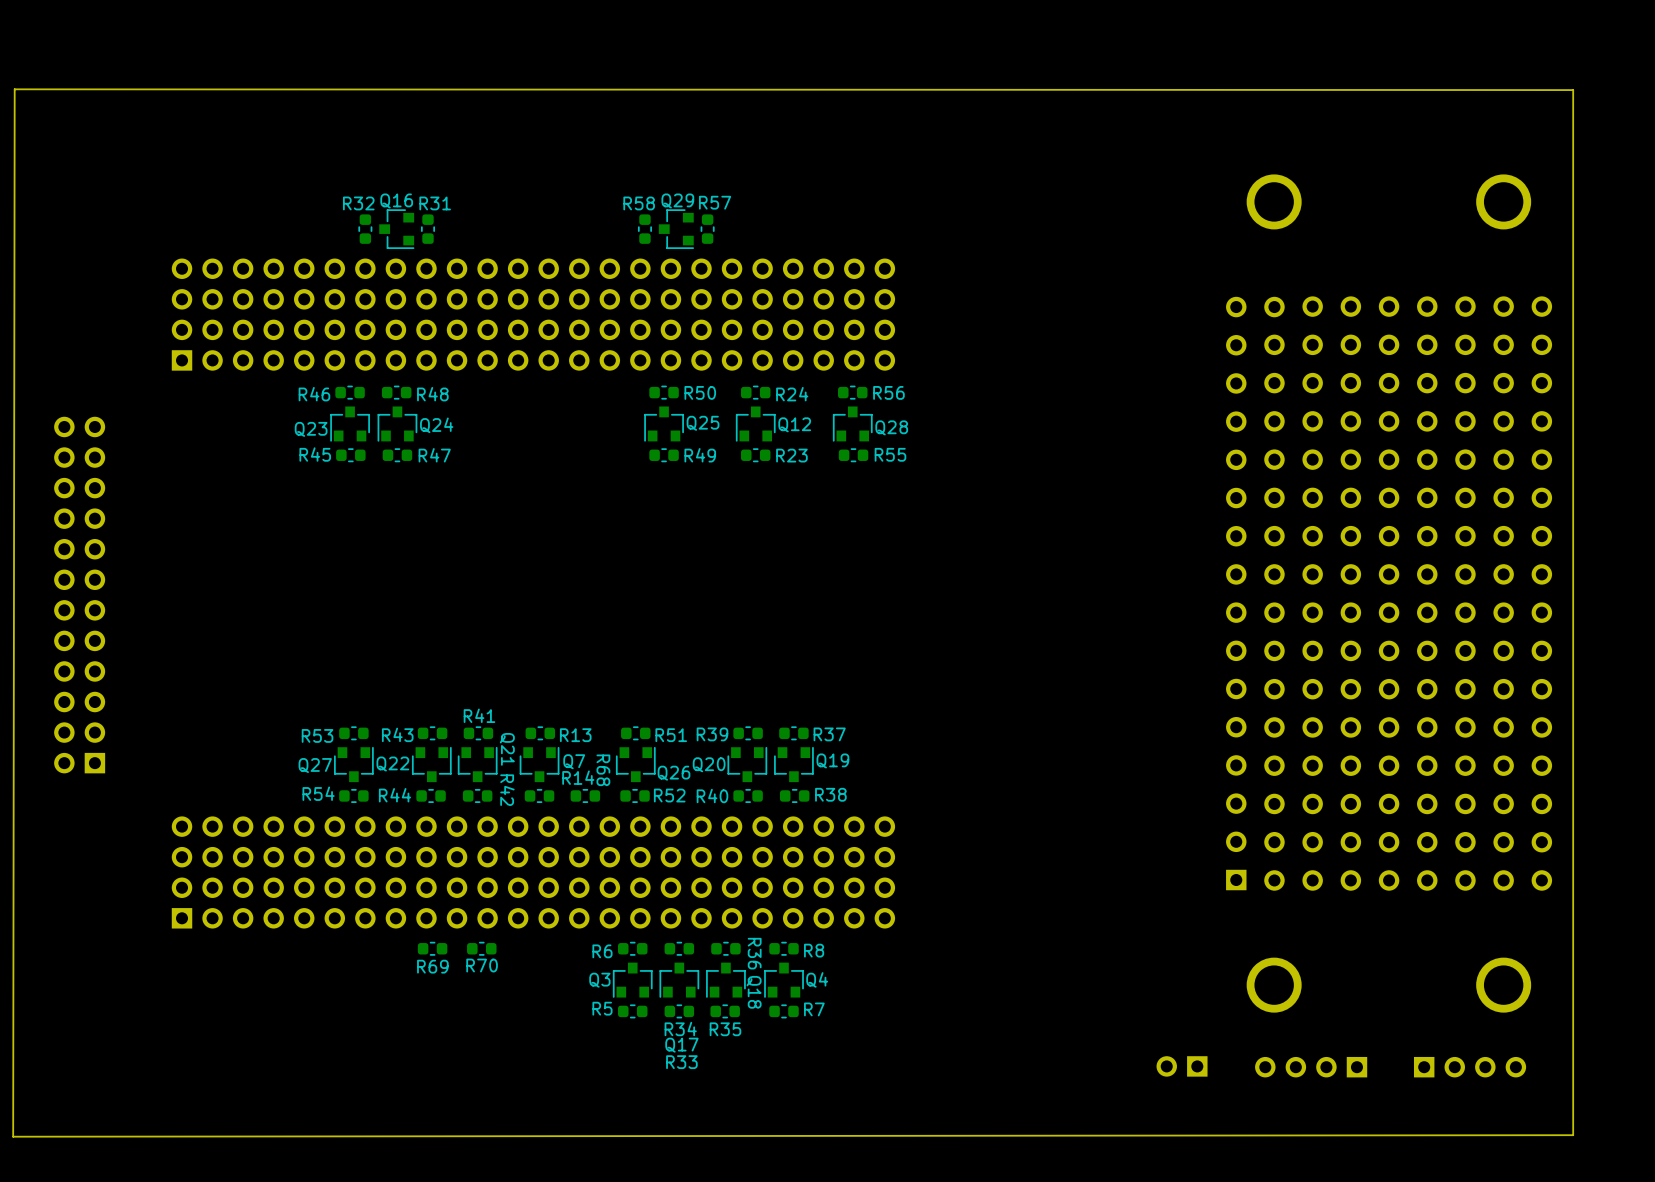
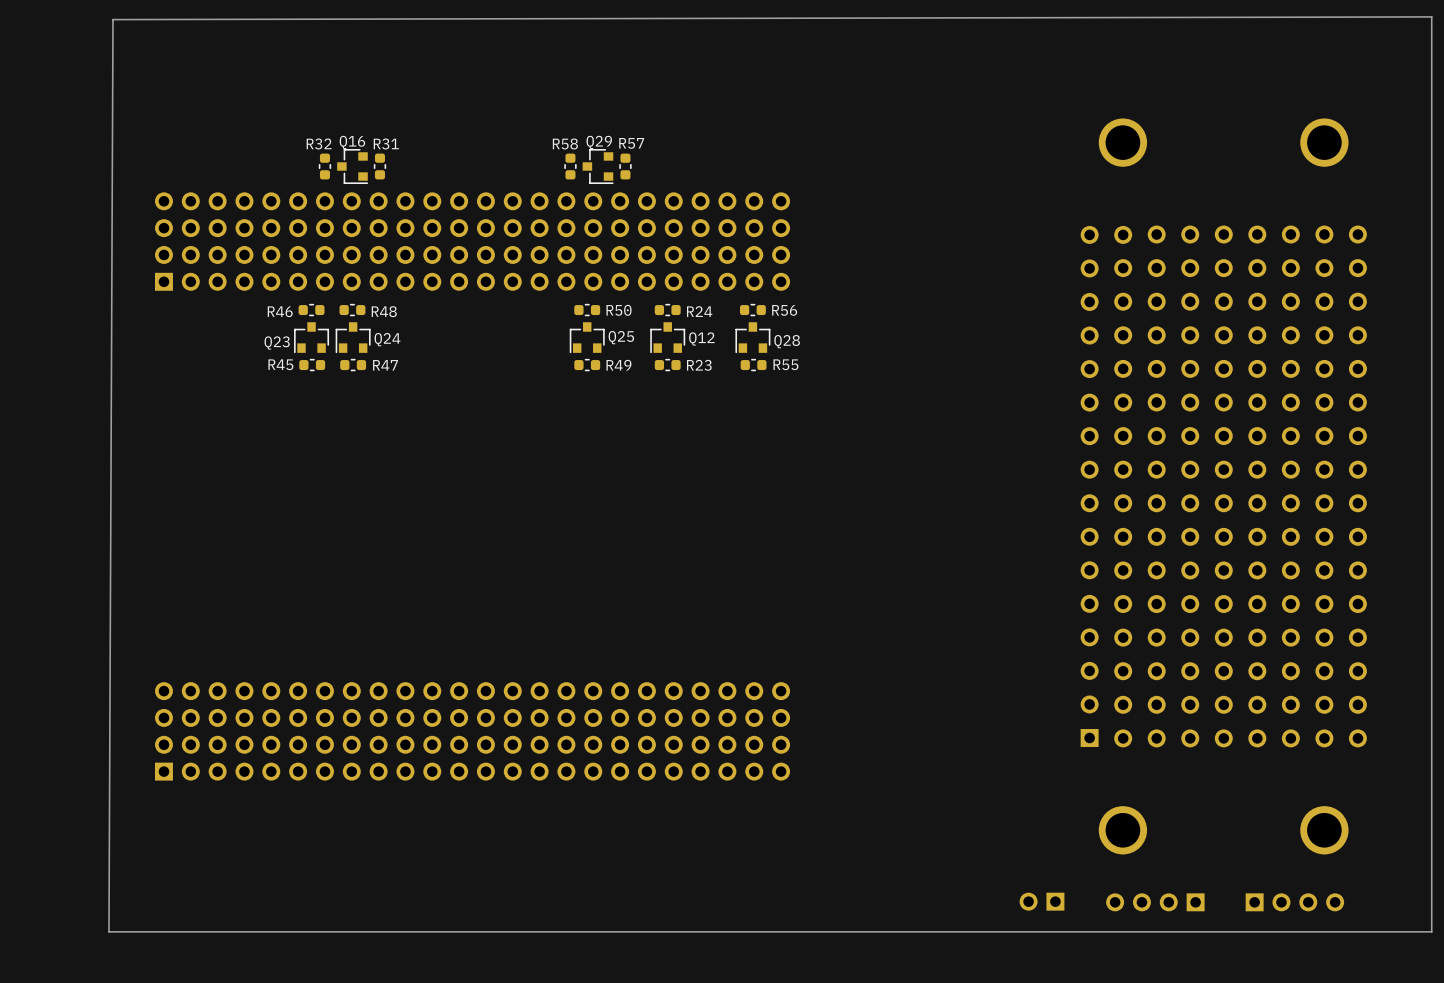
board edge: (14, 89) (13, 1136) (1573, 1135) (1573, 90) (14, 89) -> (1431, 16) (1431, 931) (108, 931) (113, 19) (1431, 16)
part: (79, 595) -> none
R53: (353, 733) -> none
R43: (432, 733) -> none
R41: (478, 733) -> none
R13: (540, 733) -> none
R51: (635, 733) -> none
R39: (748, 733) -> none
R37: (793, 733) -> none
Q27: (353, 764) -> none
Q22: (431, 764) -> none
Q21: (477, 764) -> none
Q7: (539, 764) -> none
Q26: (635, 764) -> none
Q20: (747, 764) -> none
Q19: (793, 764) -> none
R54: (353, 795) -> none
R44: (431, 795) -> none
R42: (477, 795) -> none
R14: (539, 795) -> none
R68: (585, 795) -> none
R52: (635, 795) -> none
R40: (748, 795) -> none
R38: (794, 795) -> none
R69: (432, 948) -> none
R70: (481, 948) -> none
R6: (632, 948) -> none
R34: (679, 948) -> none
R36: (725, 948) -> none
R8: (784, 948) -> none
Q3: (632, 980) -> none
Q17: (679, 980) -> none
Q18: (725, 980) -> none
Q4: (784, 980) -> none
R5: (632, 1011) -> none
R33: (679, 1011) -> none
R35: (725, 1011) -> none
R7: (784, 1011) -> none

